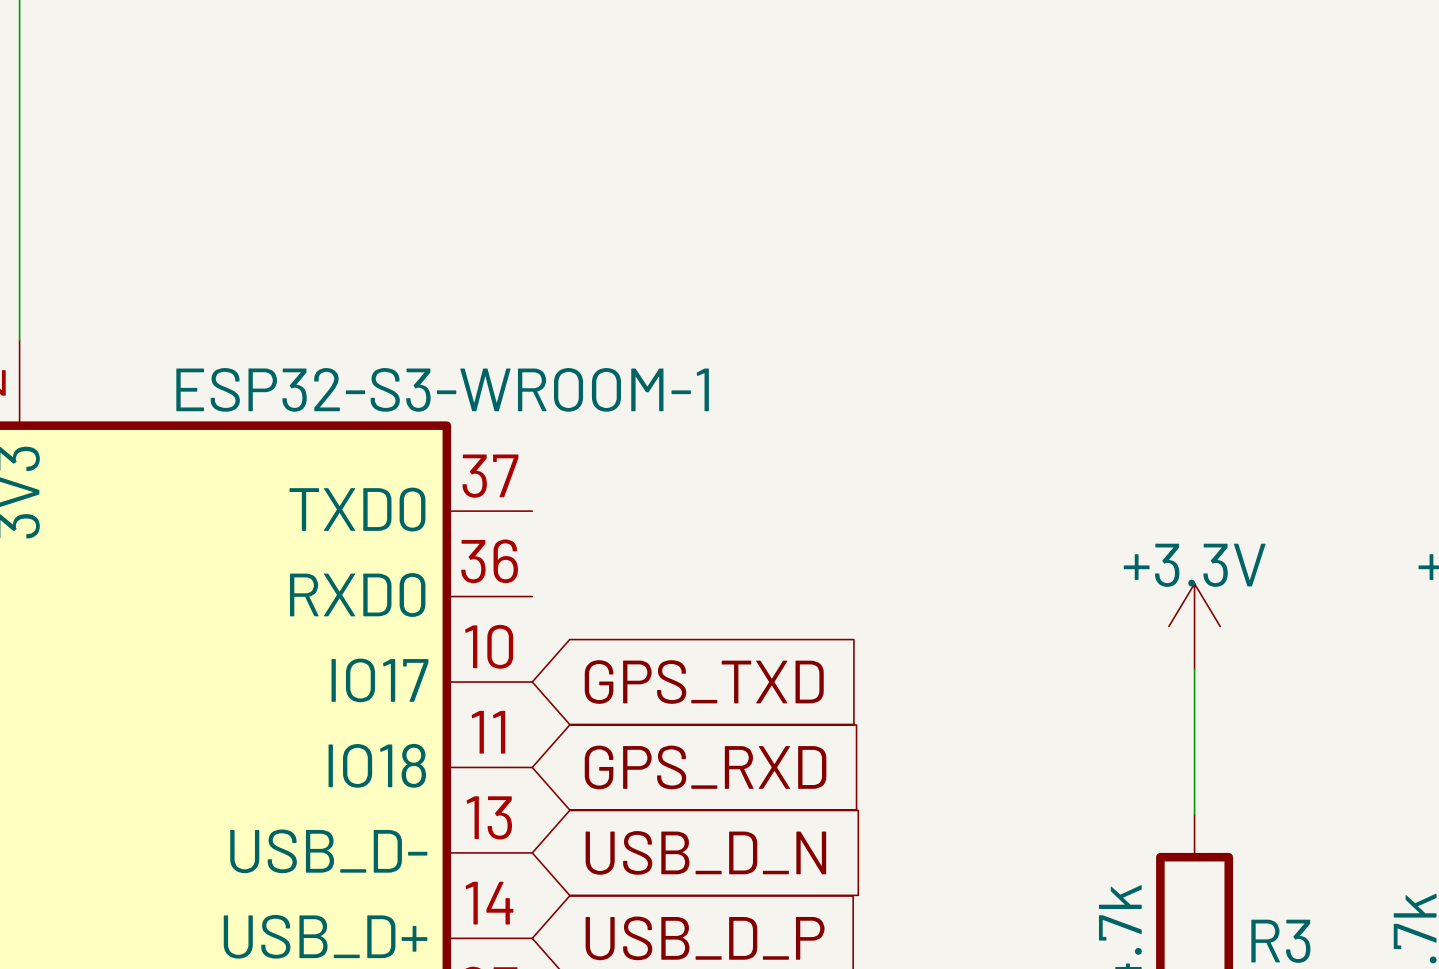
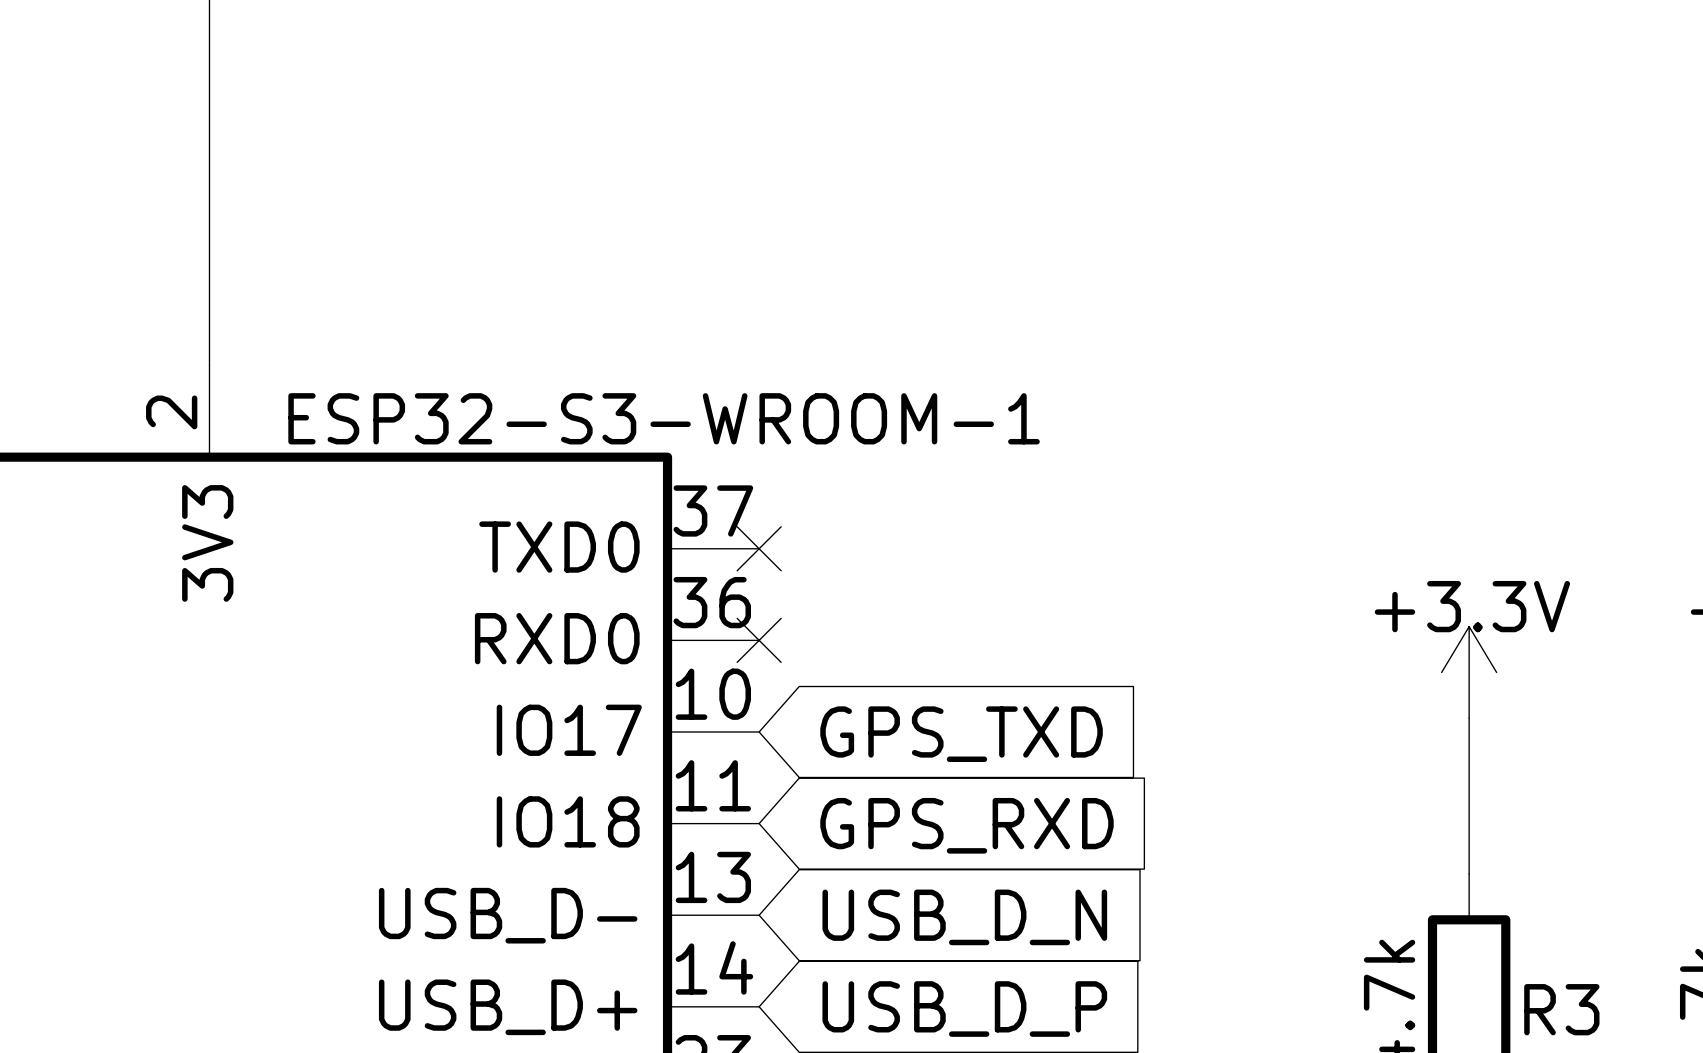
no-connect mark: none -> (759, 548)
no-connect mark: none -> (759, 640)

